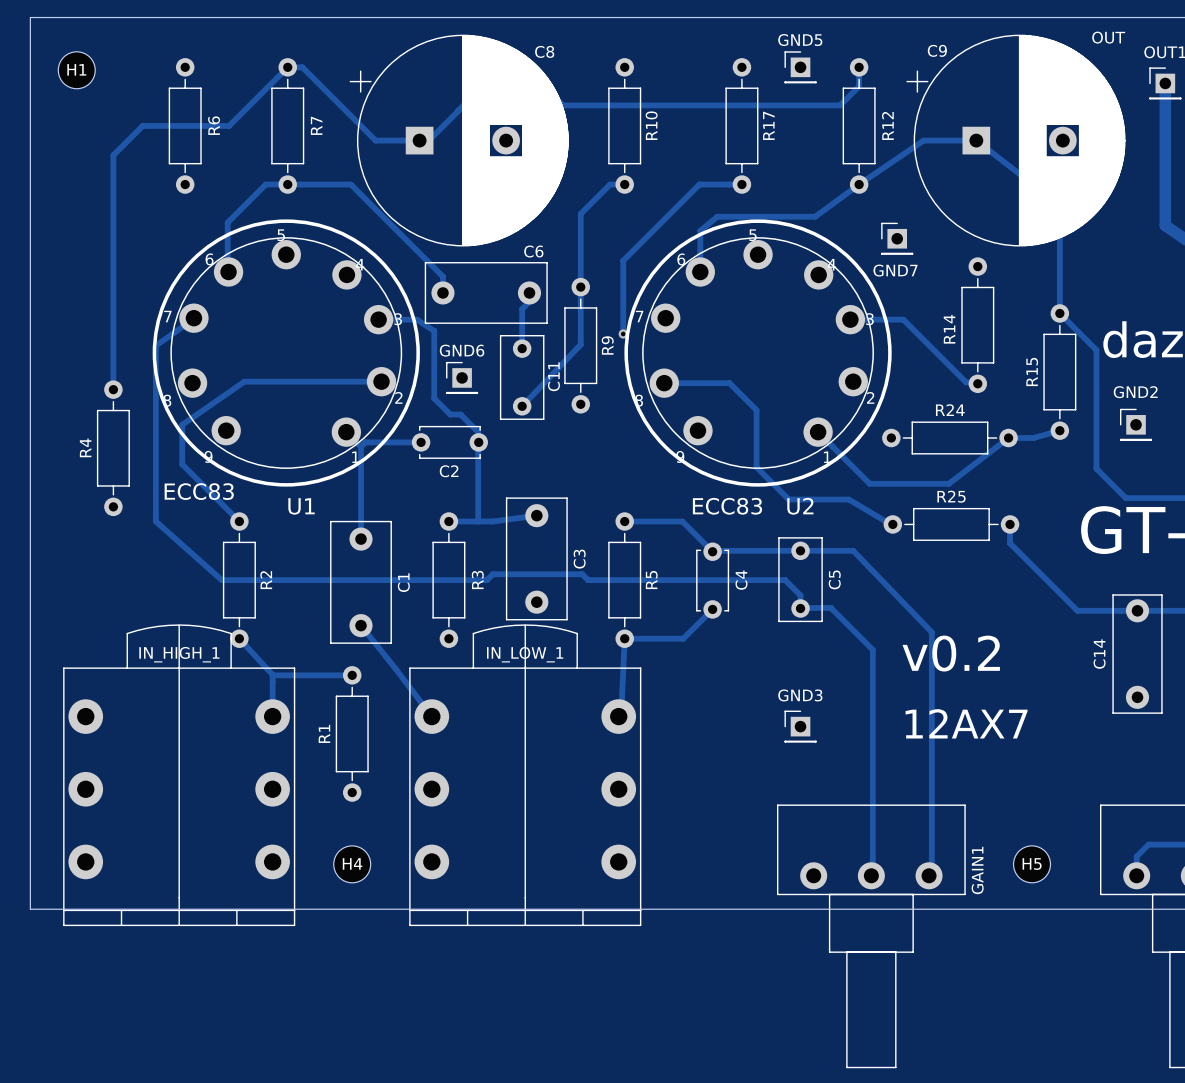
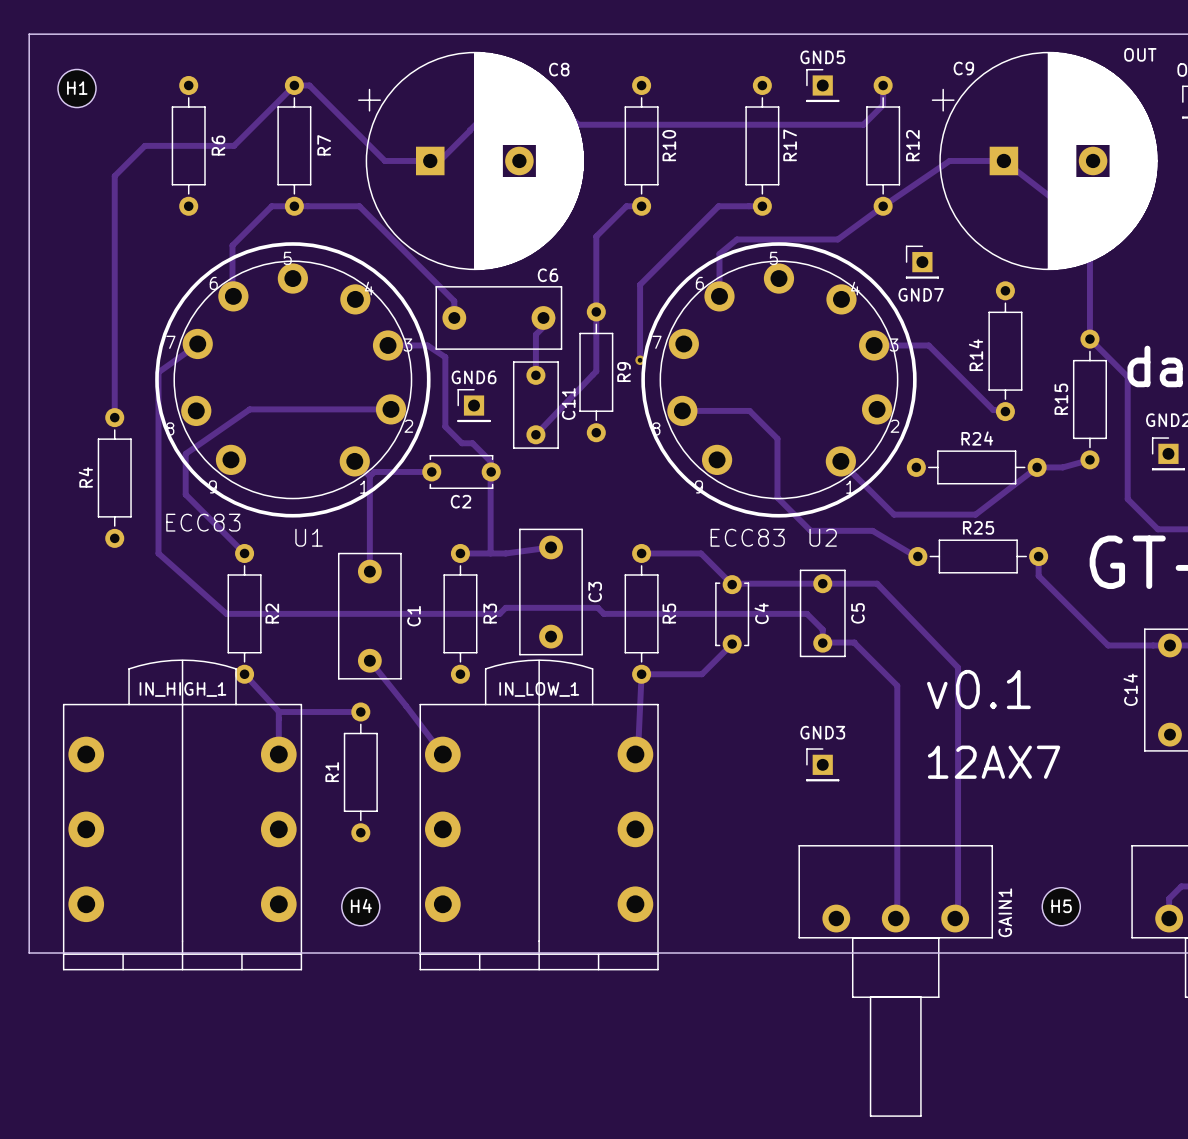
text: v0.2 (951, 653) -> v0.1 (978, 689)

